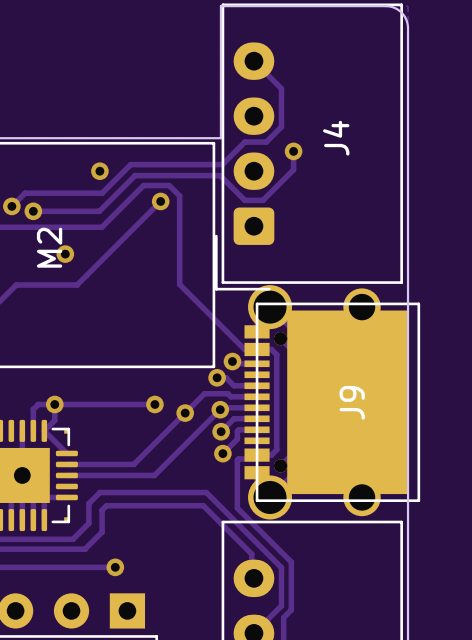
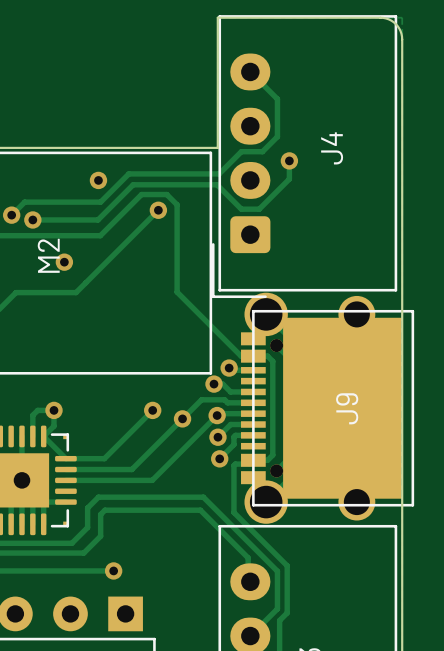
track: (54, 404) (154, 404) -> (65, 458) (104, 458) (152, 410)

